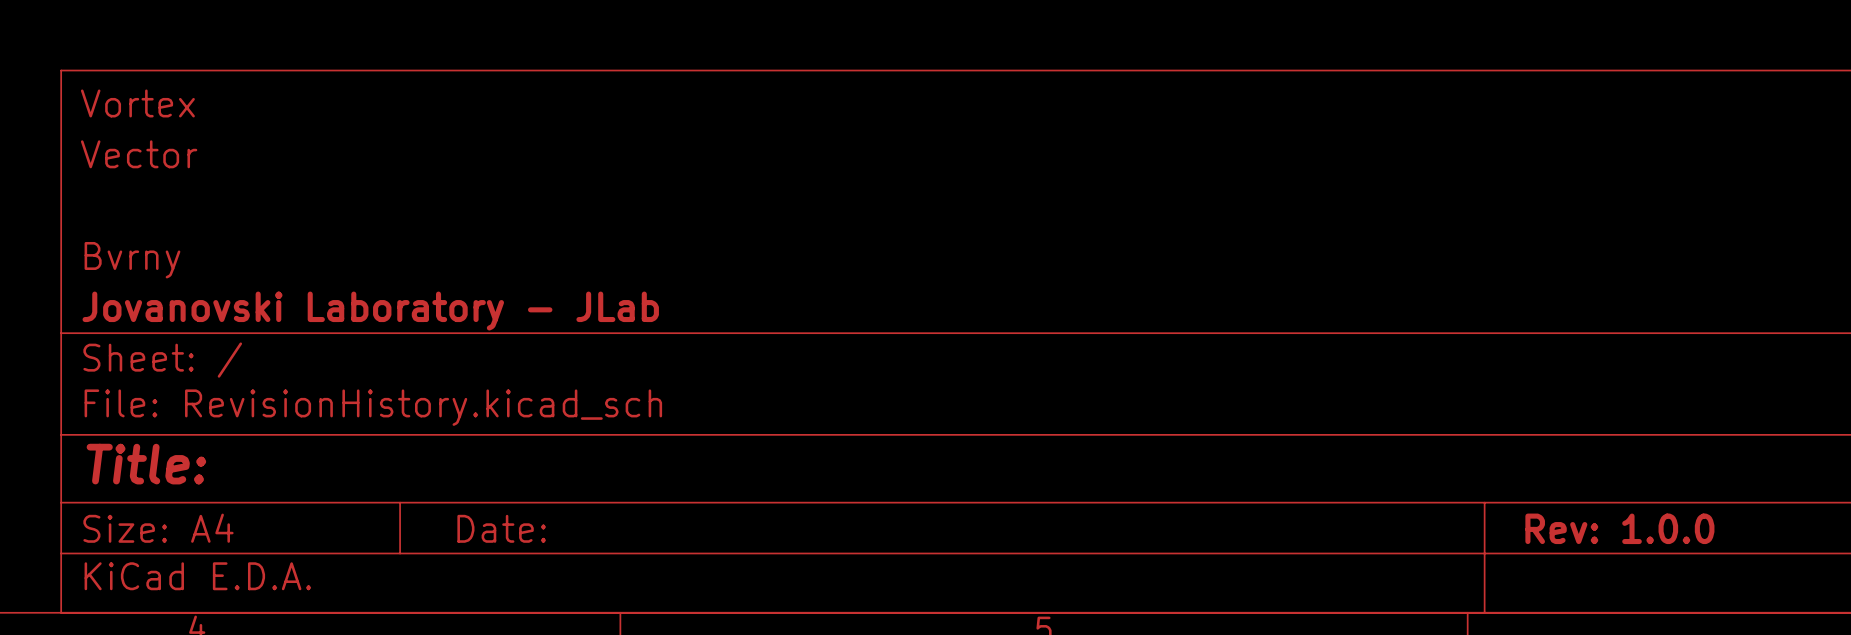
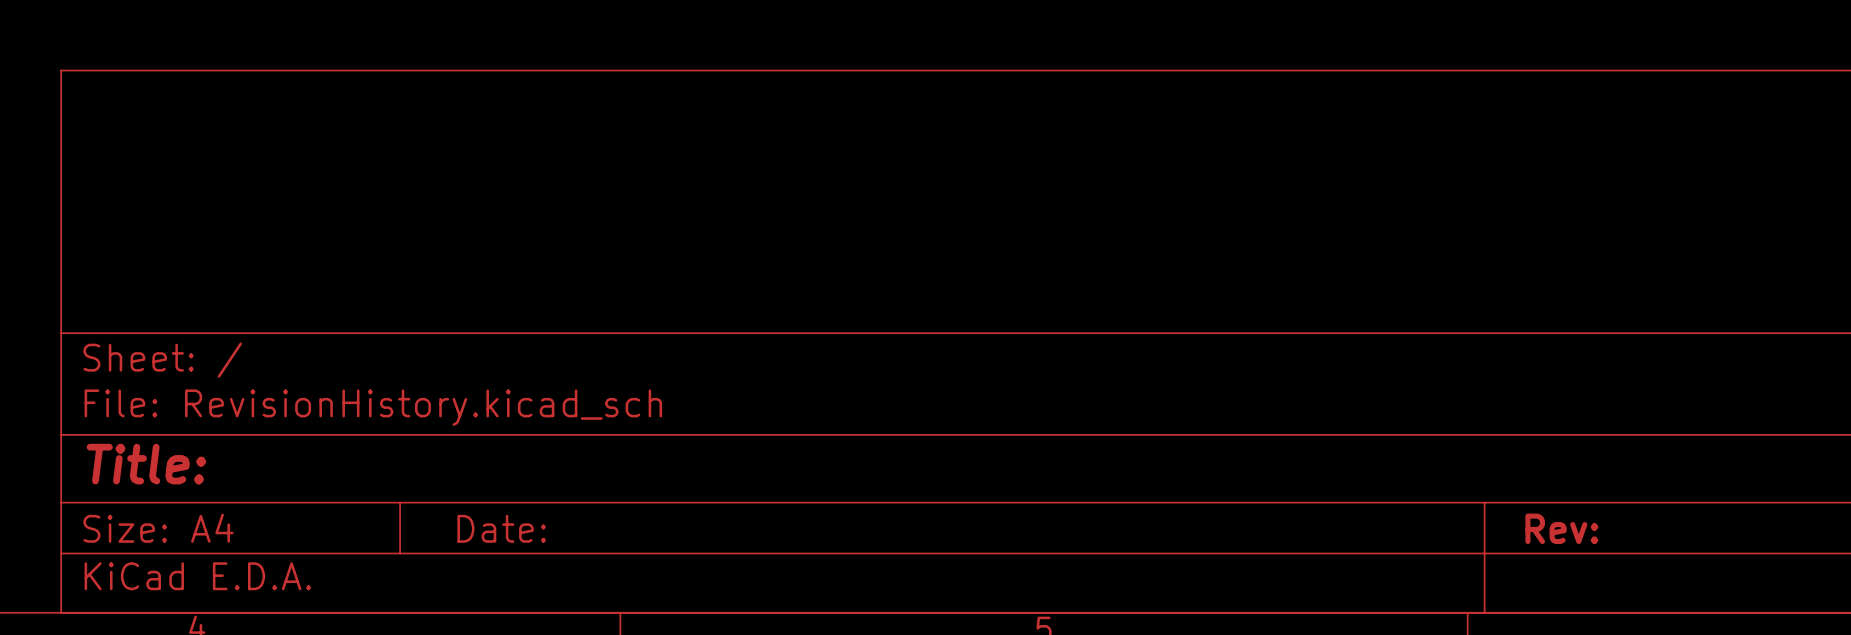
title block: Vortex (137, 103) -> none
title block: Vector (139, 154) -> none
title block: Bvrny (132, 260) -> none
title block: Jovanovski Laboratory - JLab (370, 311) -> none
title block: Rev: 1.0.0 (1619, 528) -> Rev: (1561, 528)

